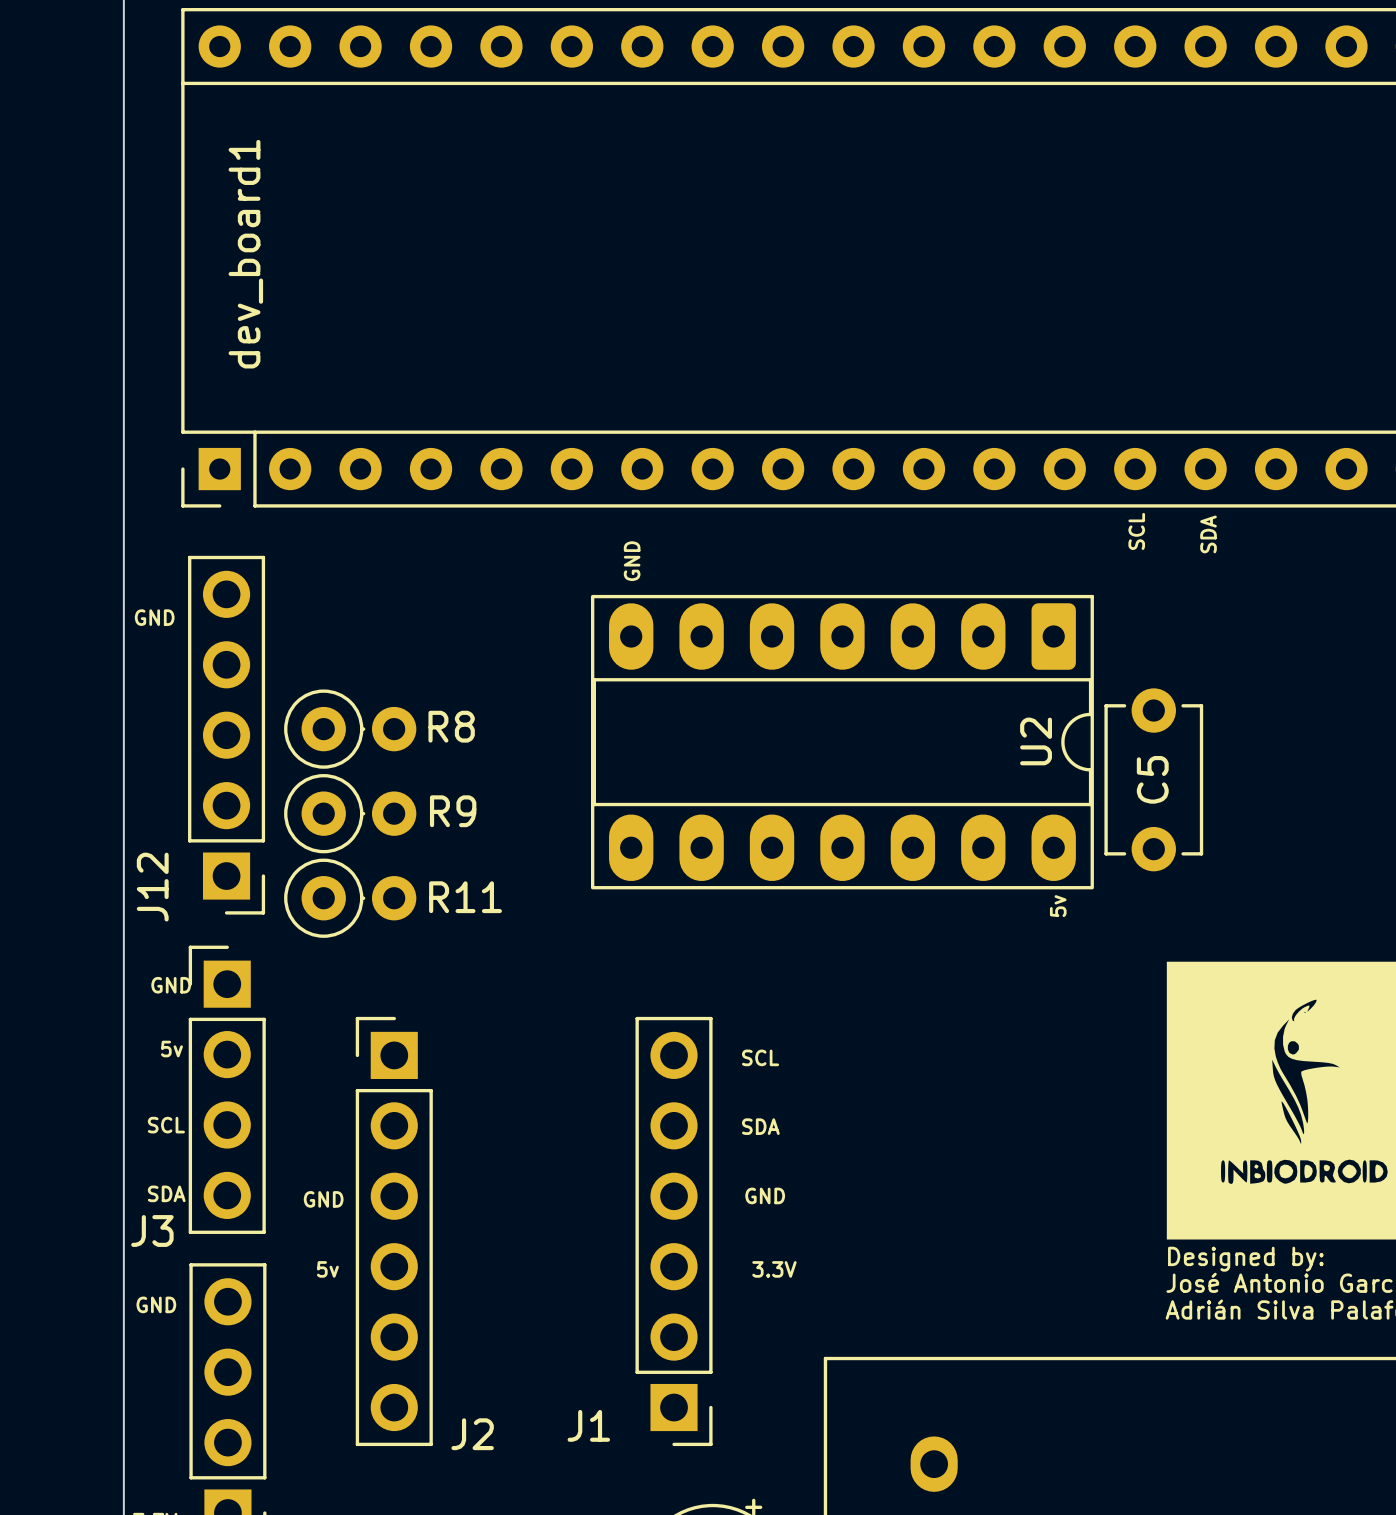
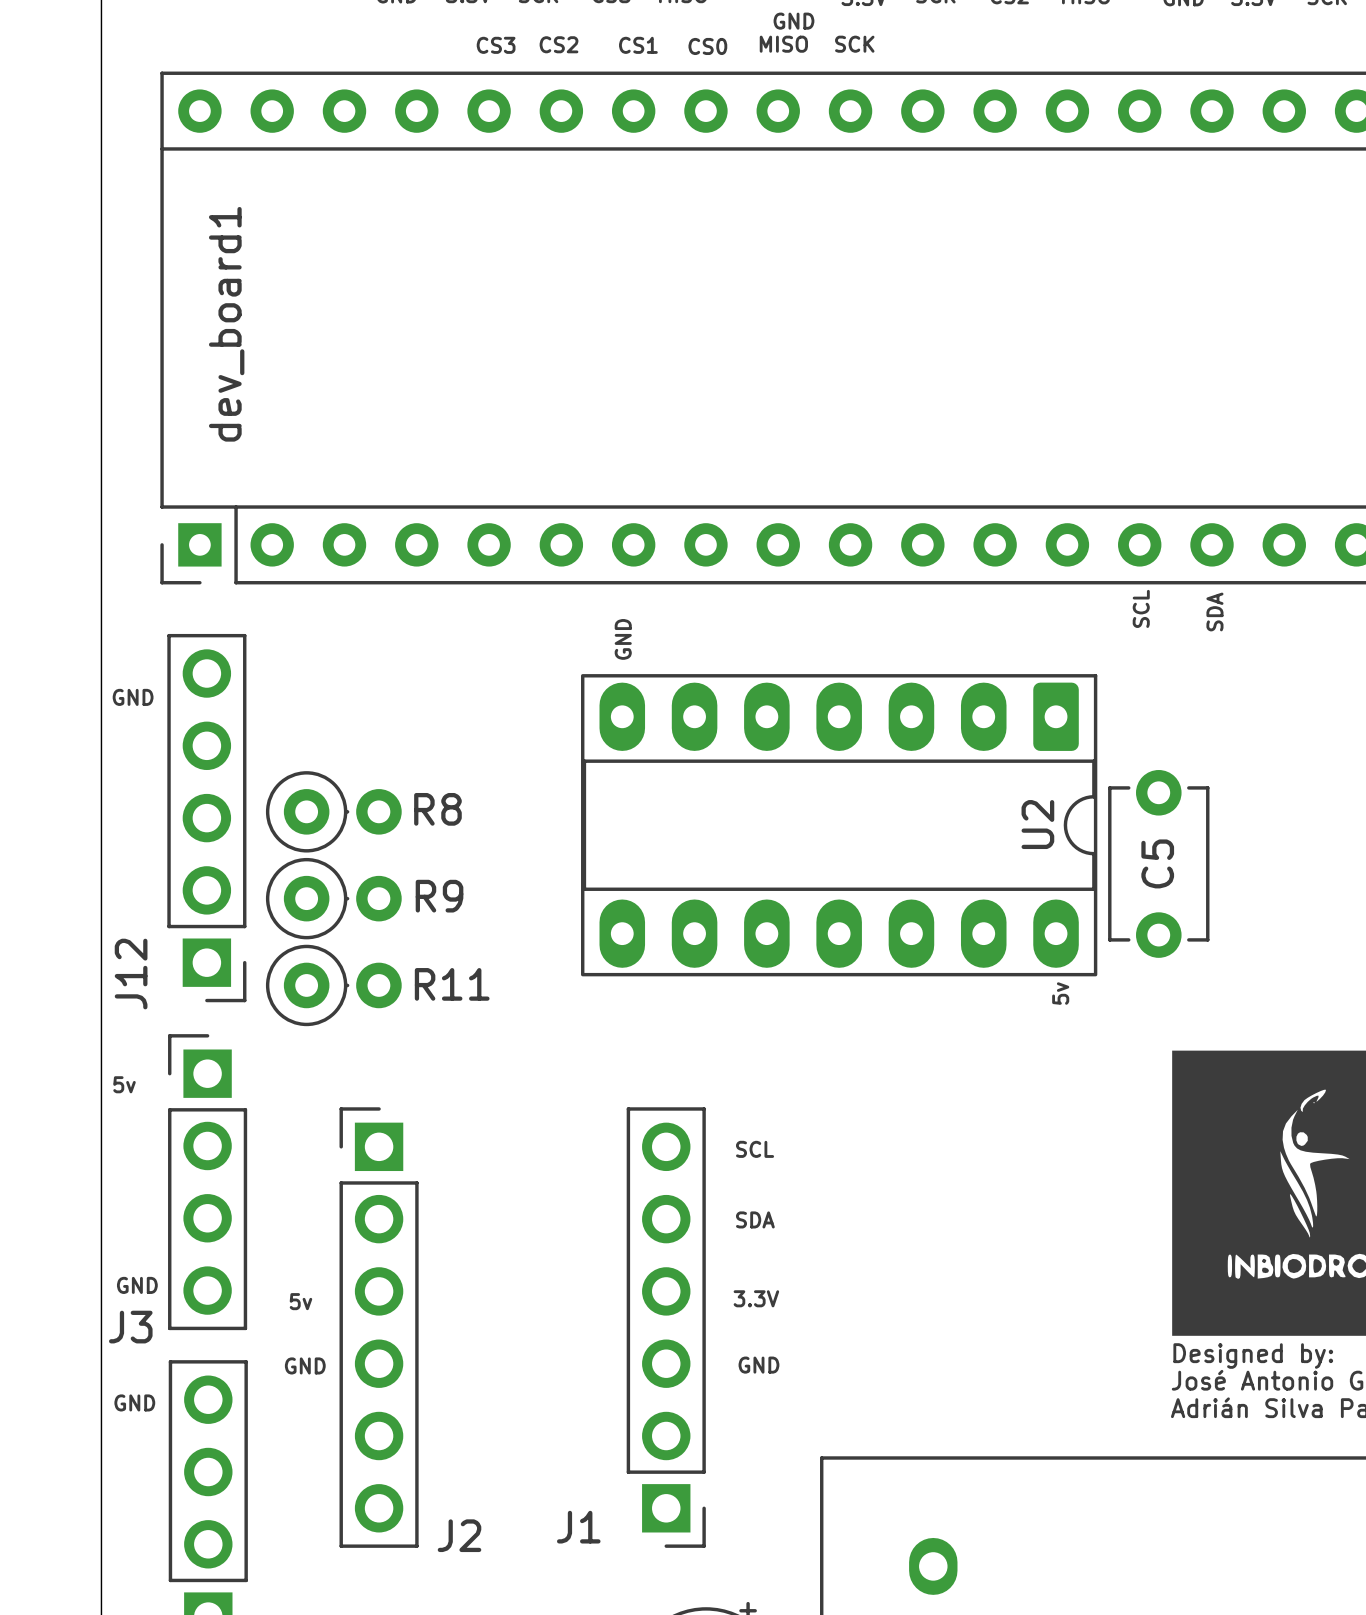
text: GND (171, 985) -> 5v (124, 1084)
text: 5v (171, 1049) -> none
text: SCL (166, 1125) -> none
text: SDA (166, 1193) -> GND (137, 1285)
text: GND (765, 1195) -> 3.3V (756, 1298)
text: GND (323, 1199) -> 5v (300, 1301)
text: 5v (327, 1269) -> GND (305, 1365)
text: 3.3V (774, 1269) -> GND (758, 1365)

